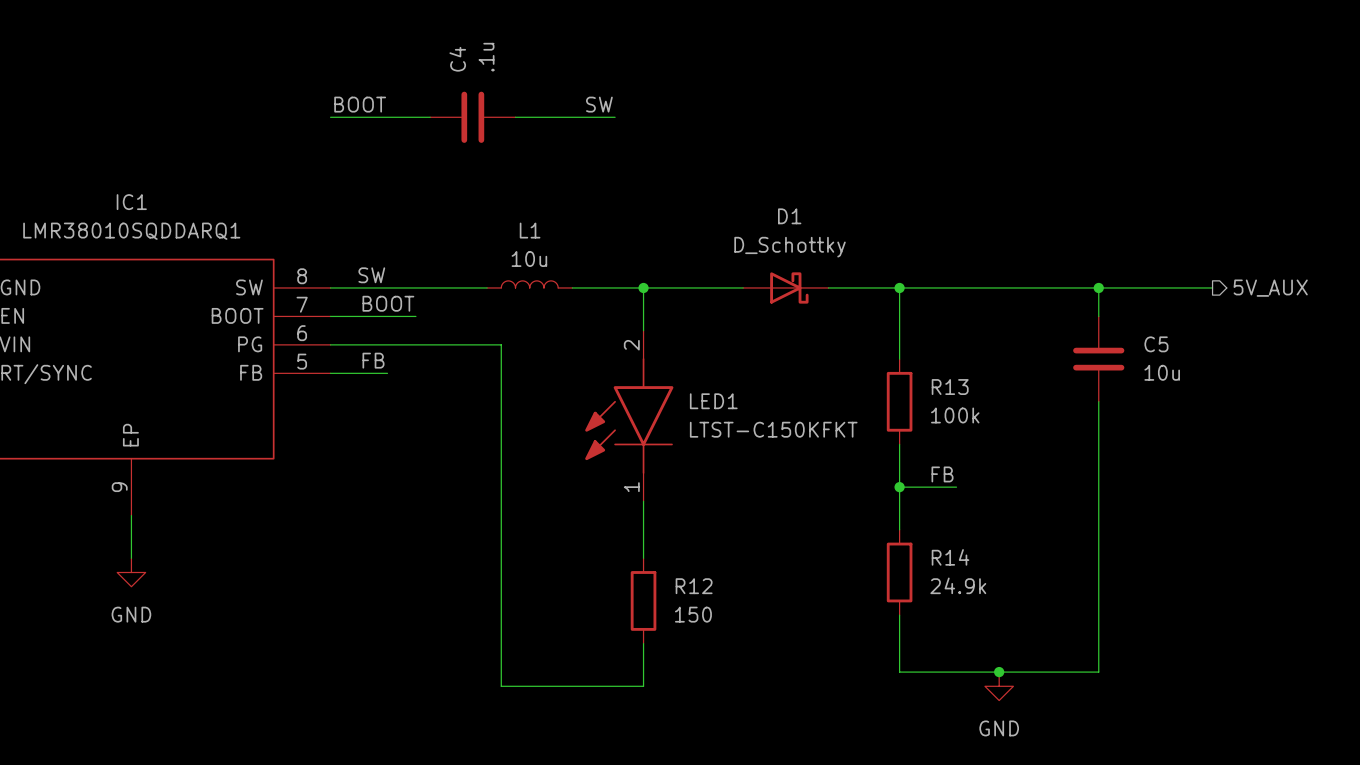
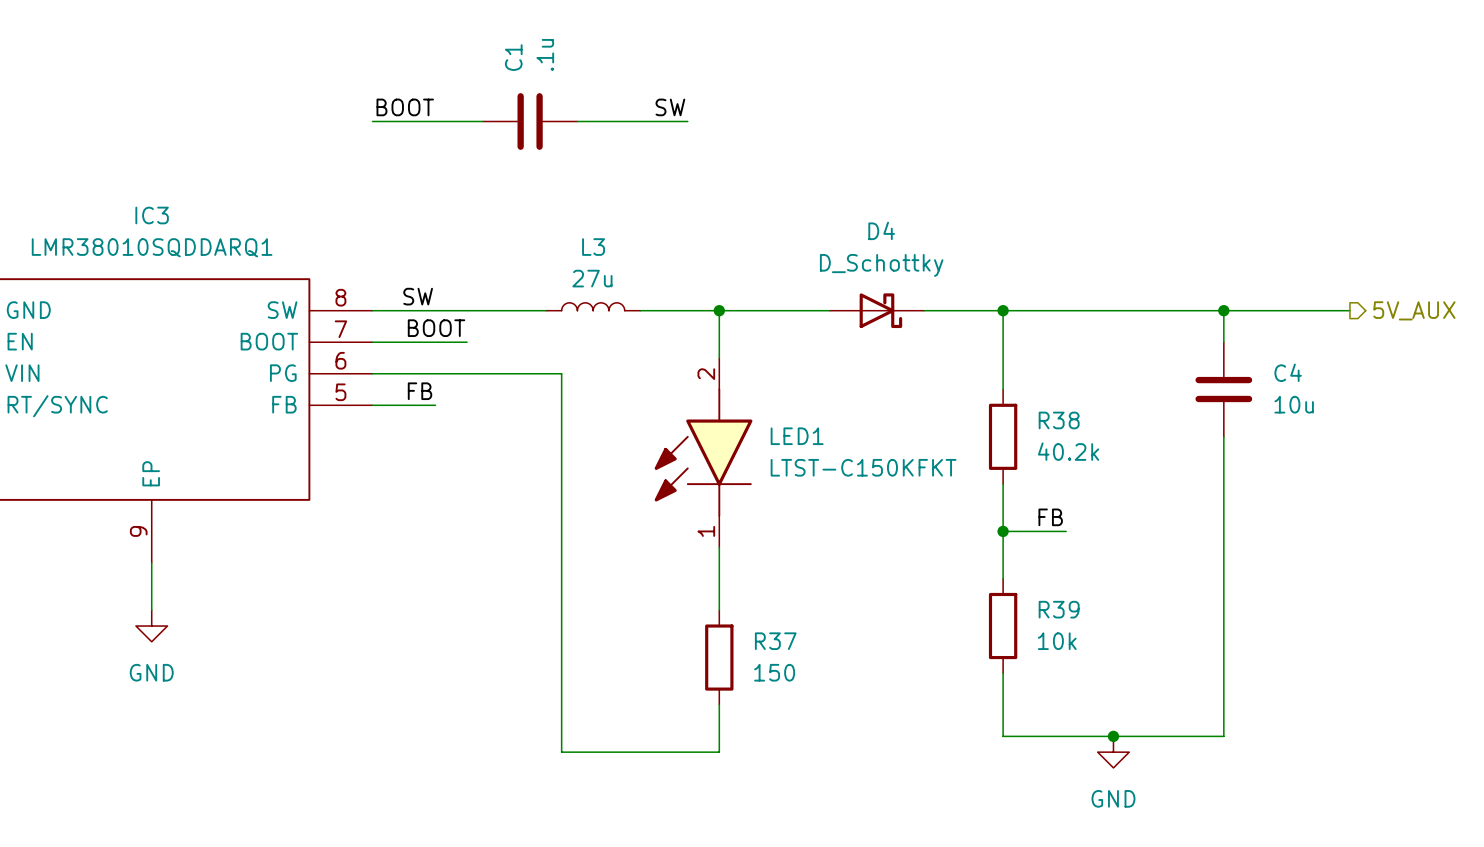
C4 name: C4 (457, 59) -> C1 (513, 57)
IC1 name: IC1 (131, 202) -> IC3 (152, 215)
D1 name: D1 (789, 216) -> D4 (881, 230)
L1 name: L1 (530, 230) -> L3 (593, 247)
L1 value: 10u (529, 259) -> 27u (592, 278)
C5 name: C5 (1156, 344) -> C4 (1288, 372)
R13 name: R13 (950, 387) -> R38 (1059, 420)
R13 value: 100k (955, 415) -> 40.2k (1068, 451)
R14 name: R14 (950, 557) -> R39 (1059, 609)
R14 value: 24.9k (958, 585) -> 10k (1057, 641)
R12 name: R12 (694, 586) -> R37 (775, 641)

